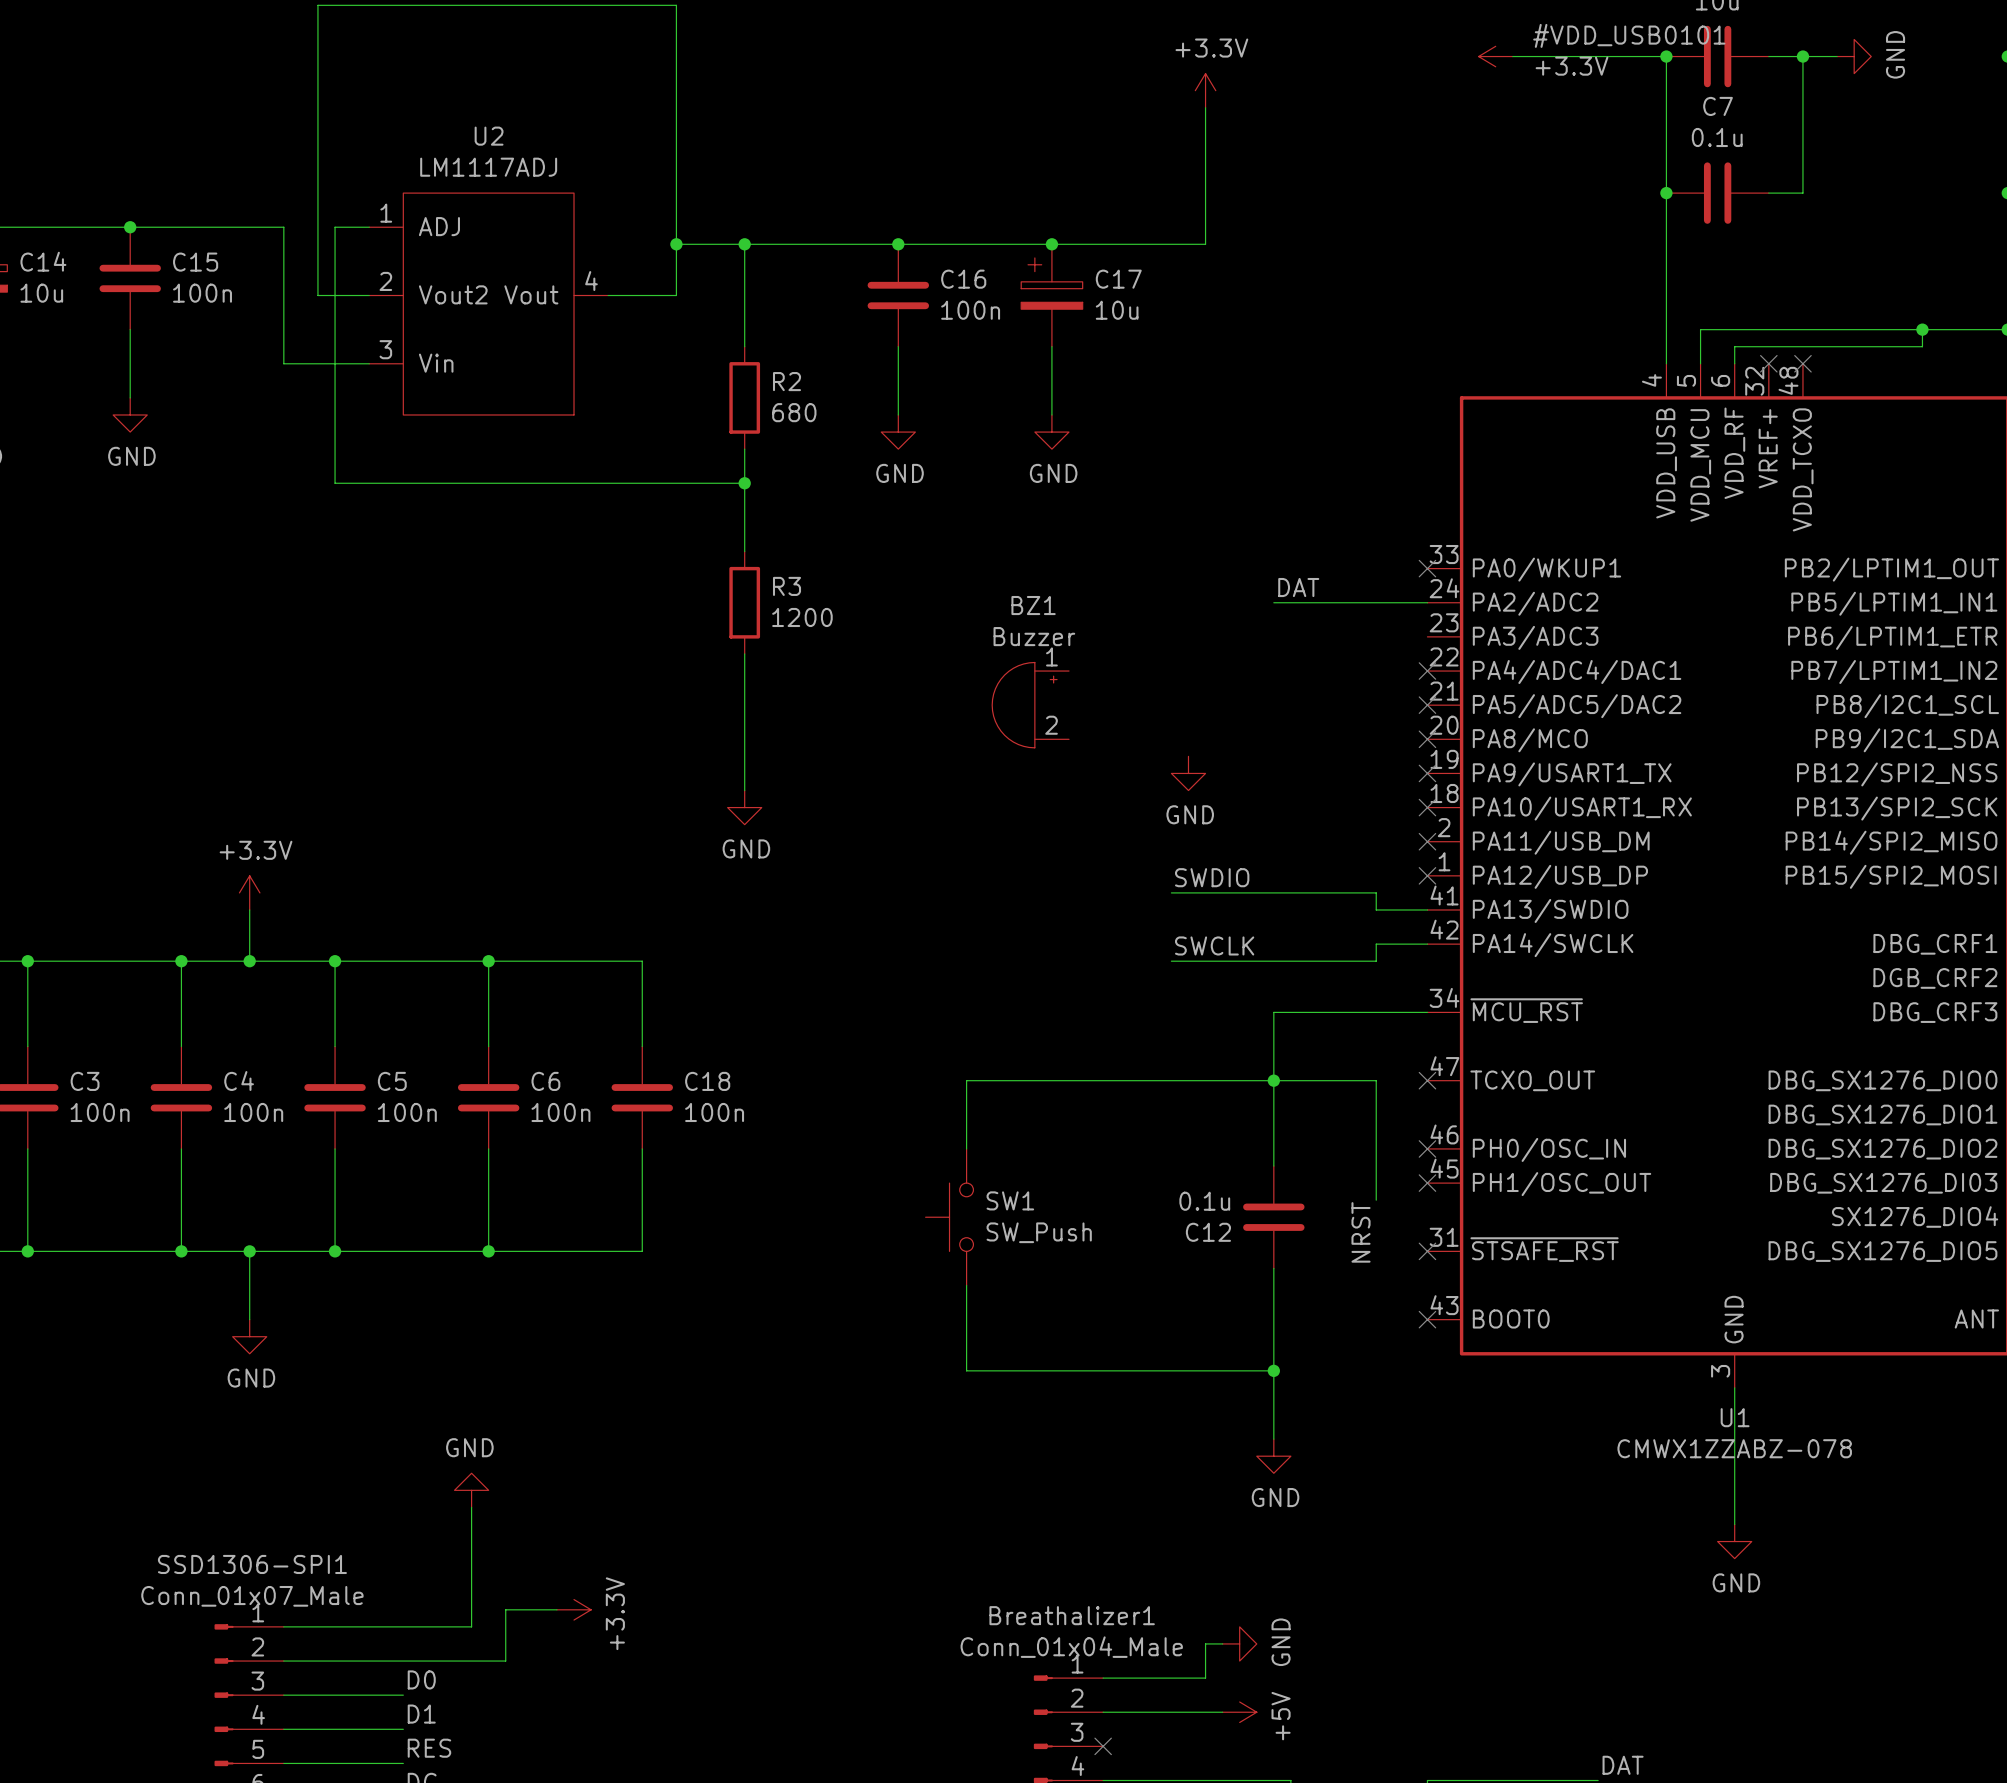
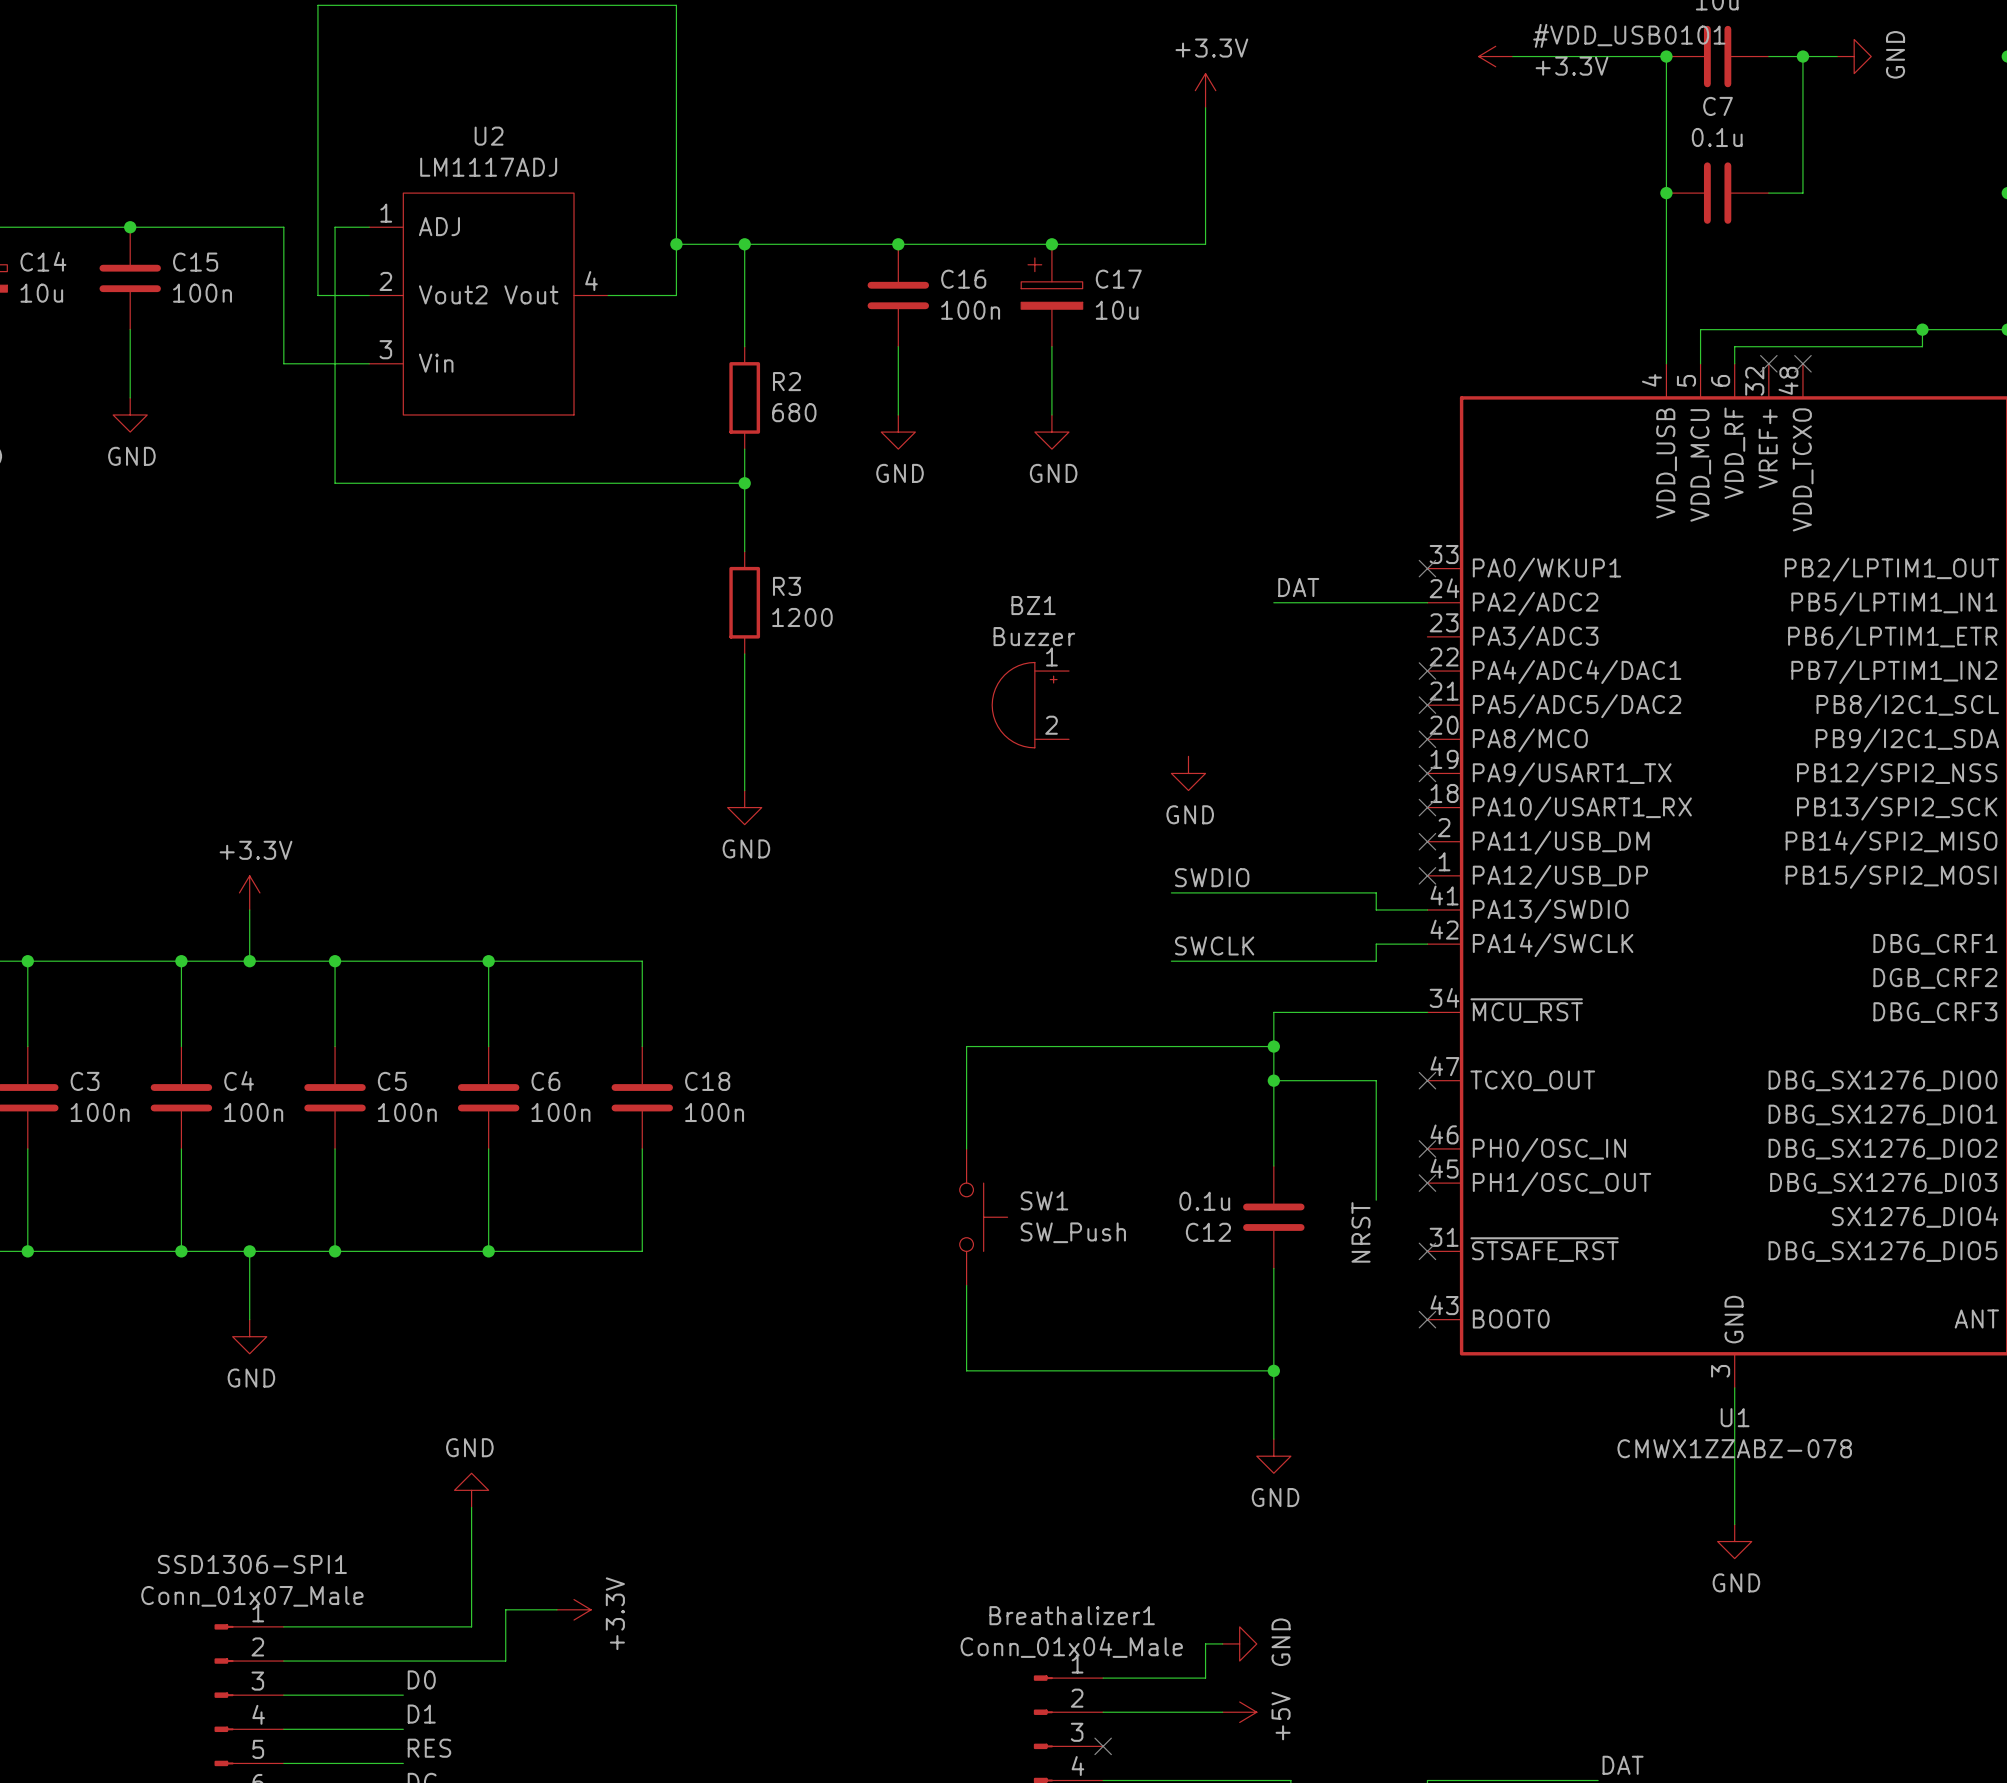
junction: none -> (1273, 1046)
wire: (966, 1080) (1273, 1080) -> (966, 1080) (966, 1046) (1273, 1046)
SW1 rotation: 0° (949, 1217) -> 180° (983, 1217)

